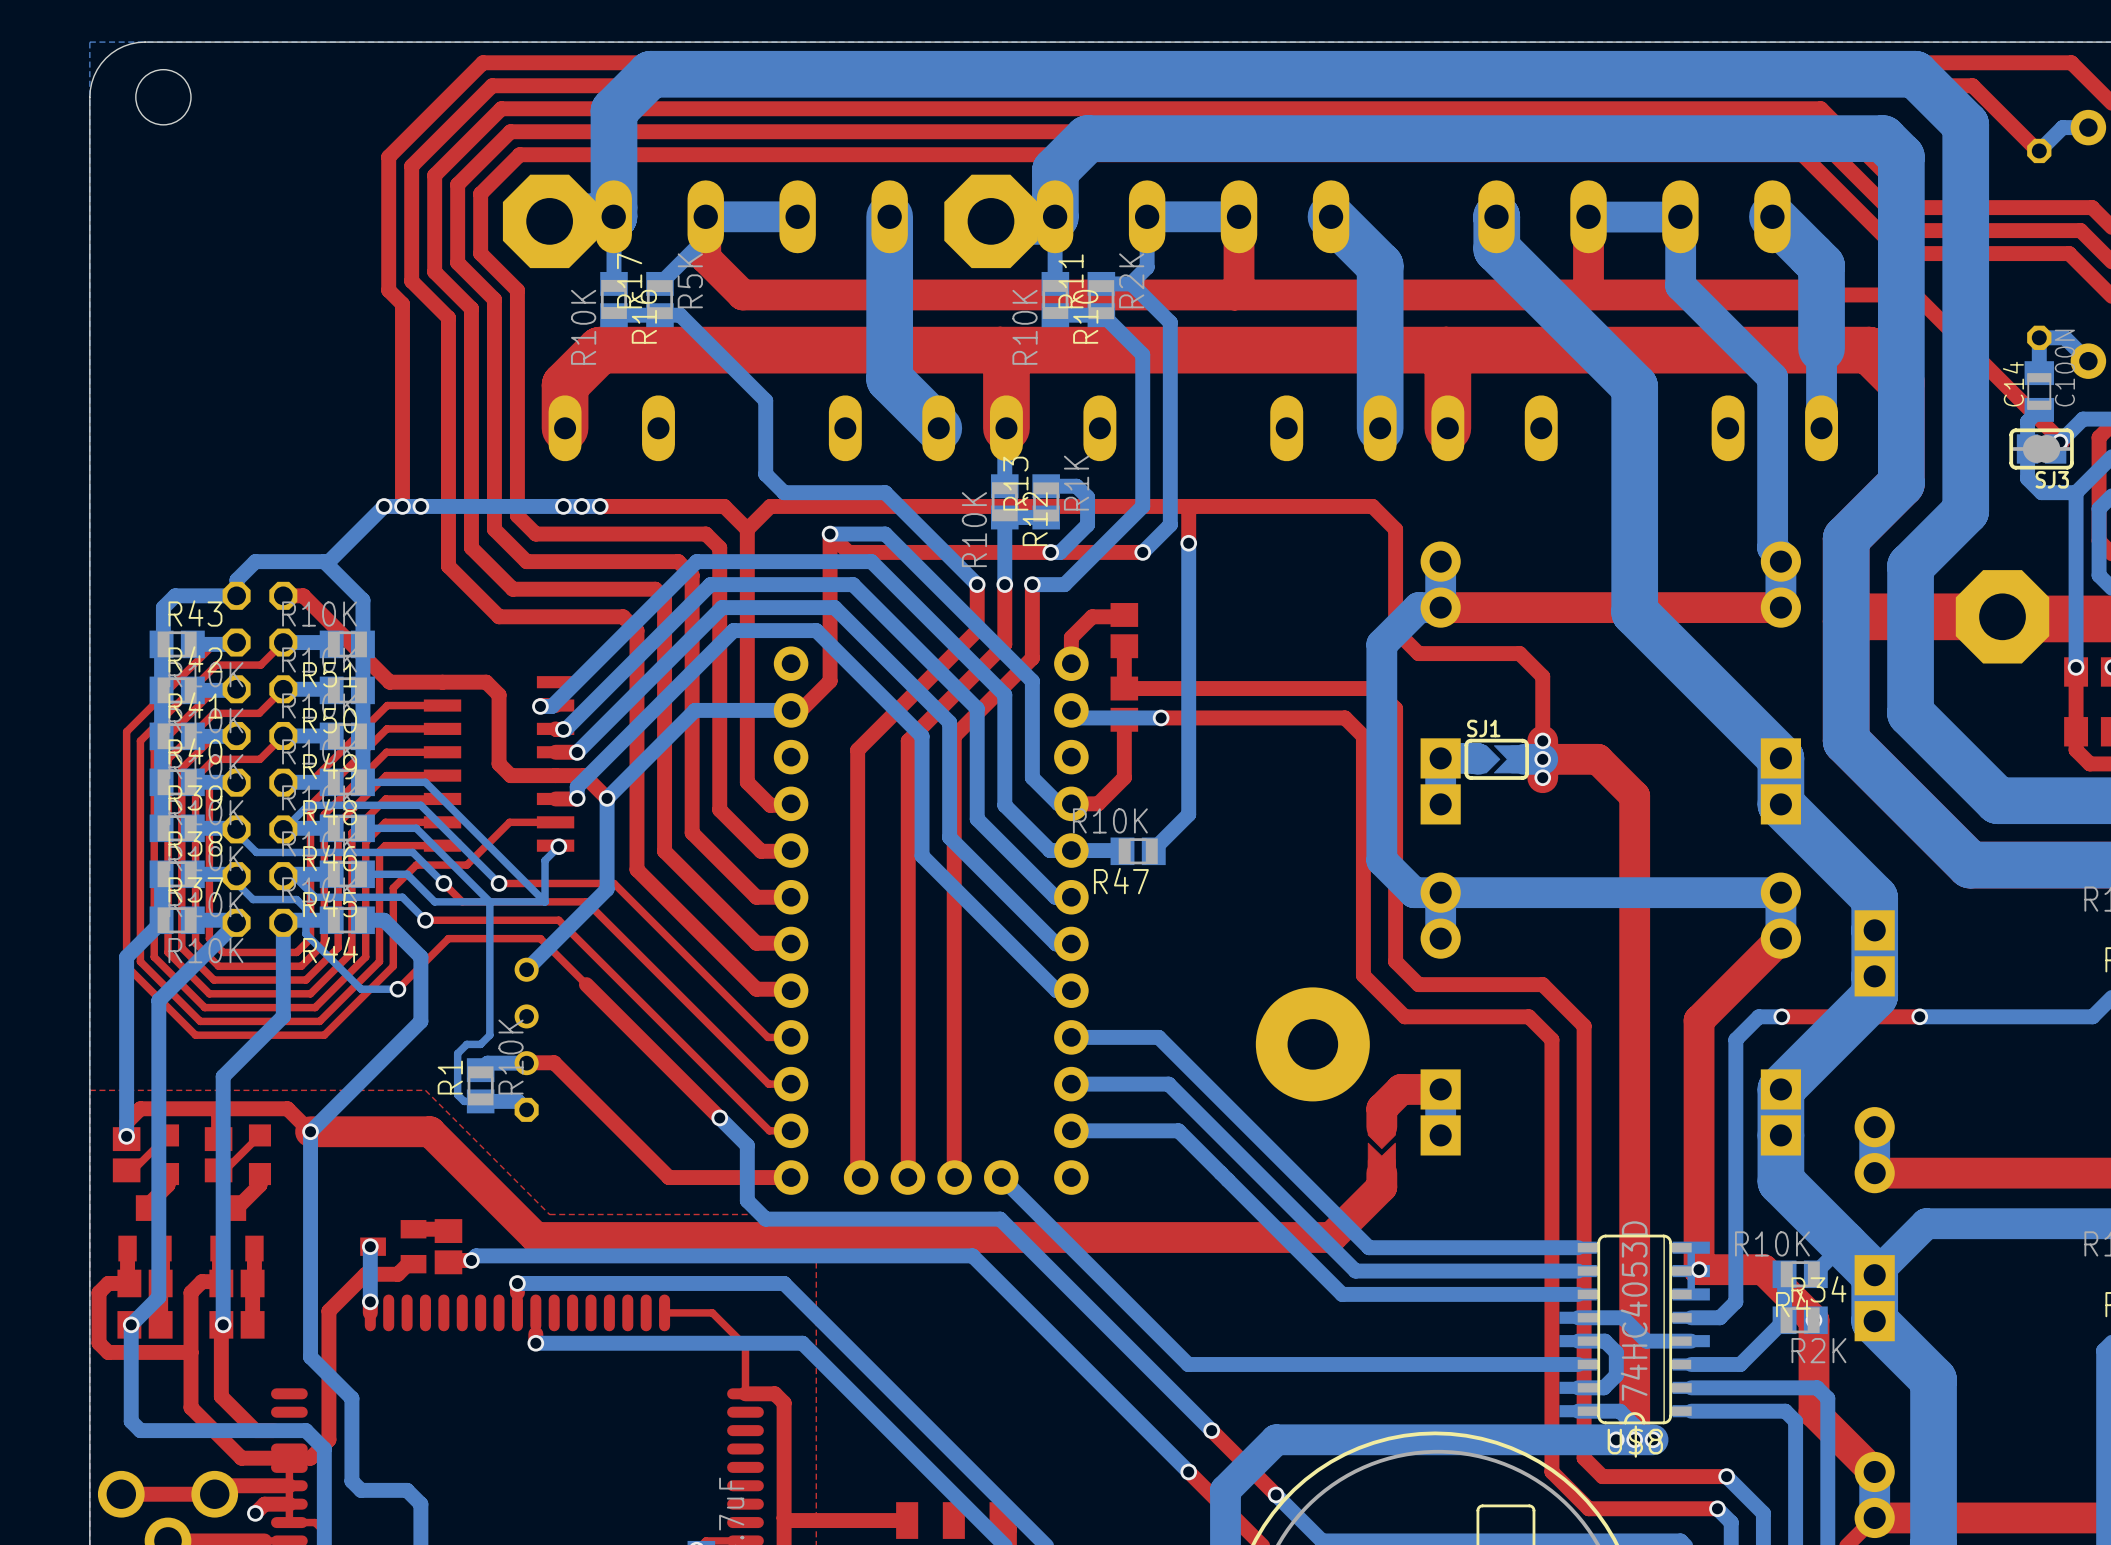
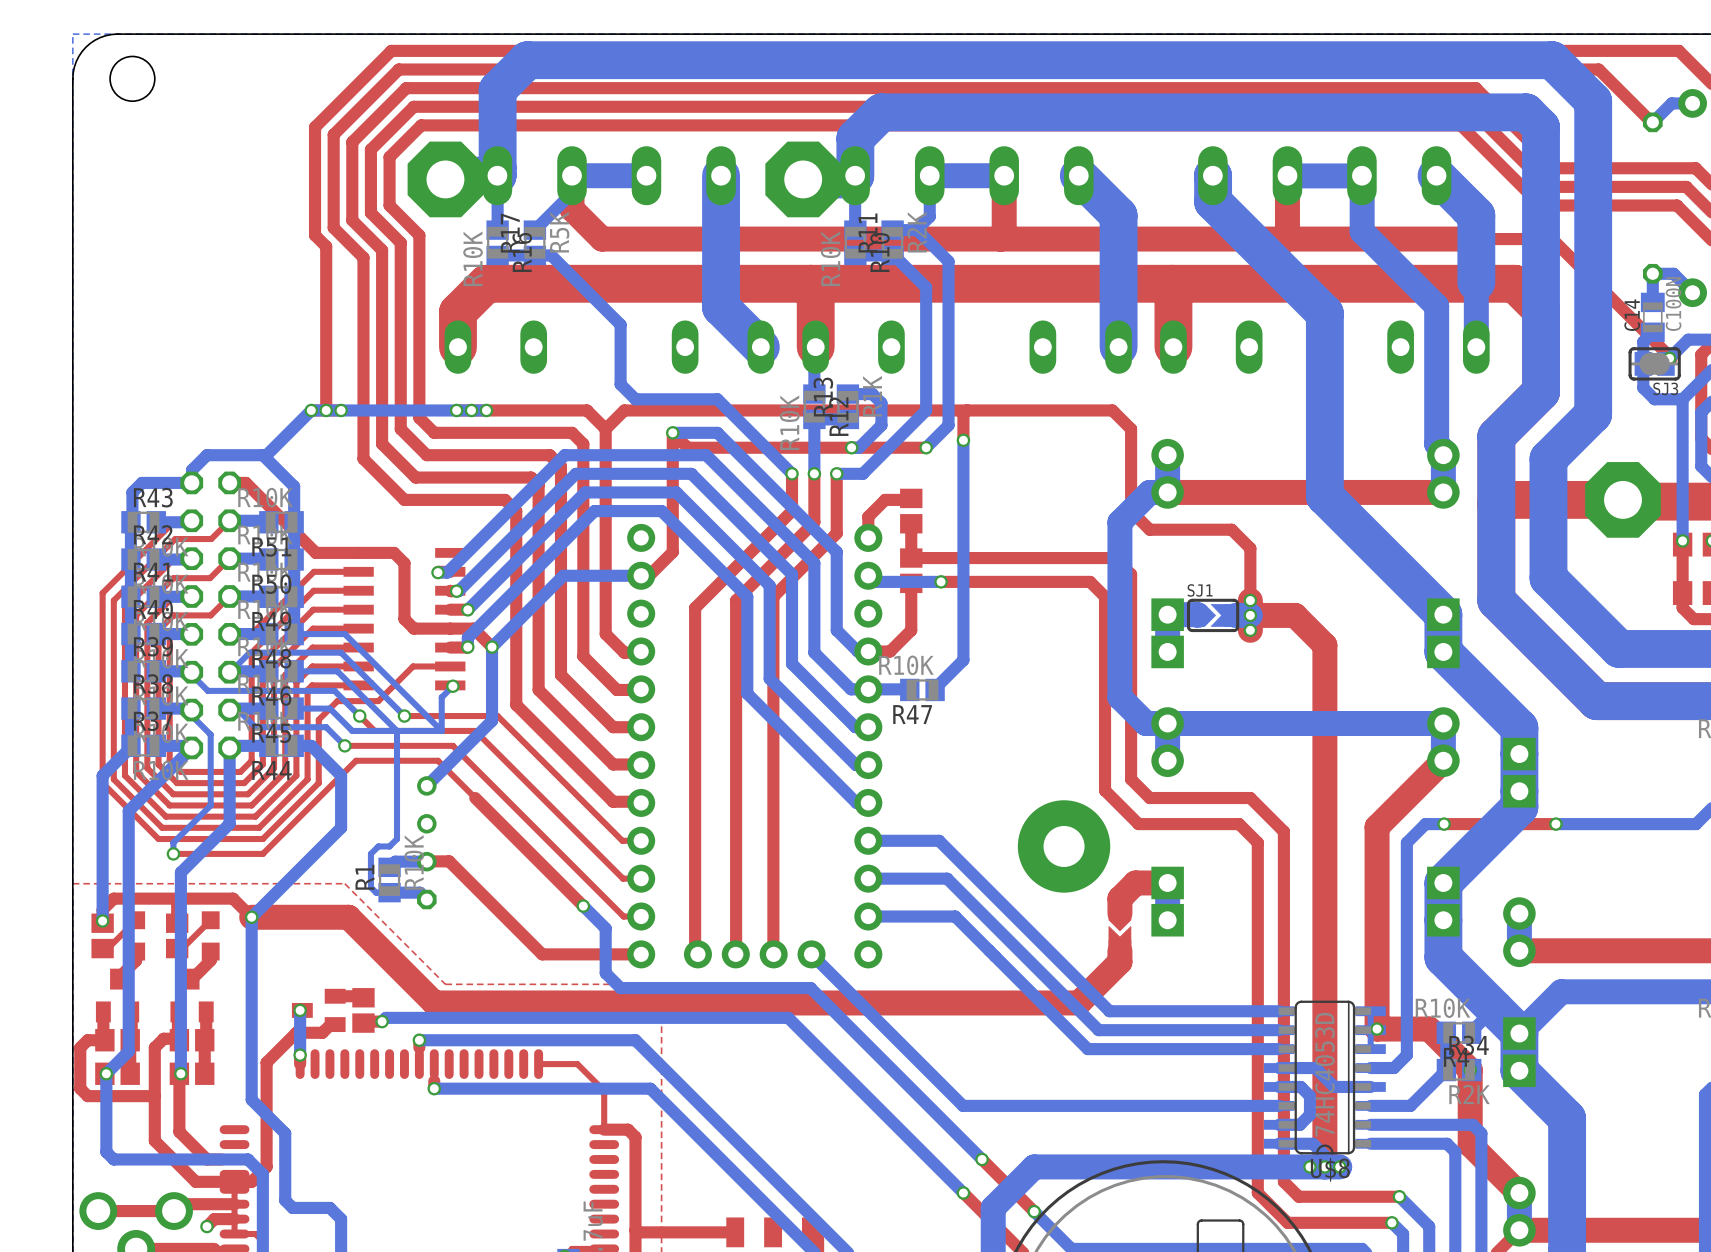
bottom track: (253, 899) (296, 899) (305, 908) (305, 934) (361, 989) (397, 989) -> (205, 729) (210, 734) (210, 805) (173, 842) (173, 853)
top track: (448, 938) (397, 989) -> (363, 760) (356, 760) (262, 853) (173, 853)
via: (397, 989) -> none
via: none -> (173, 853)

